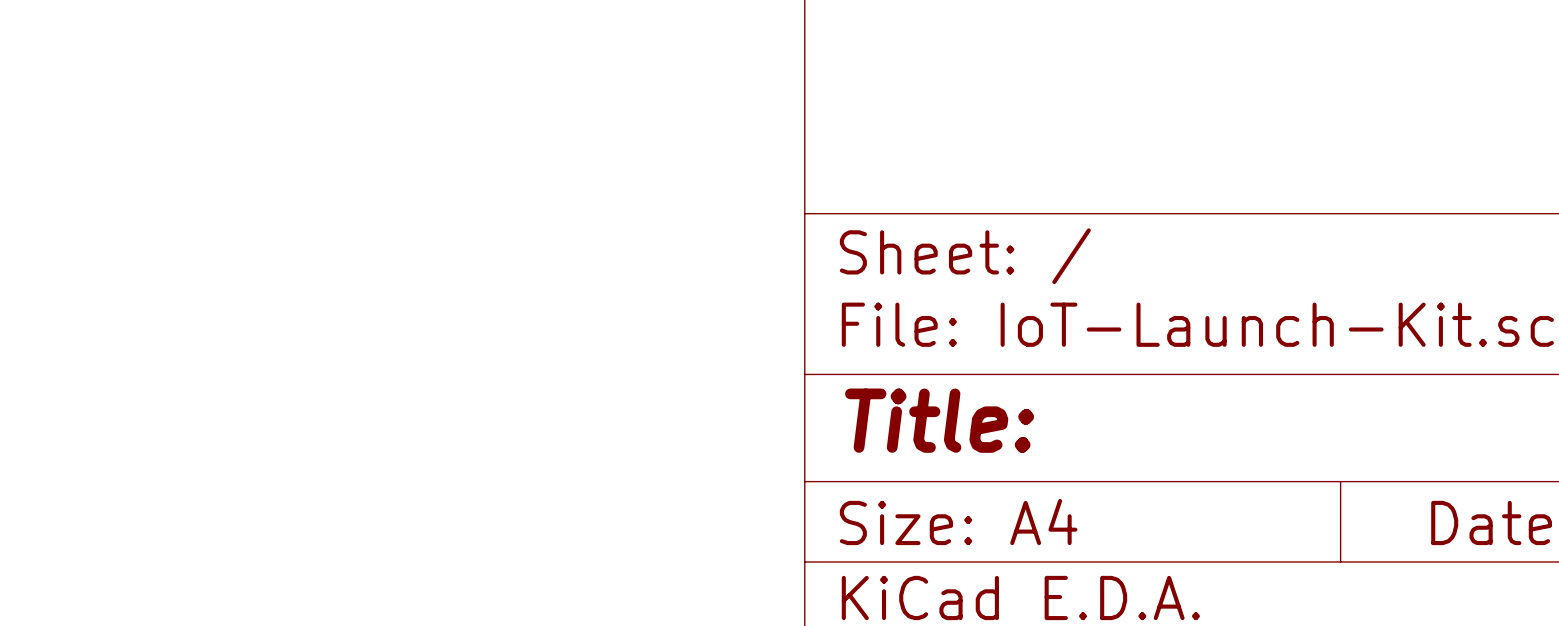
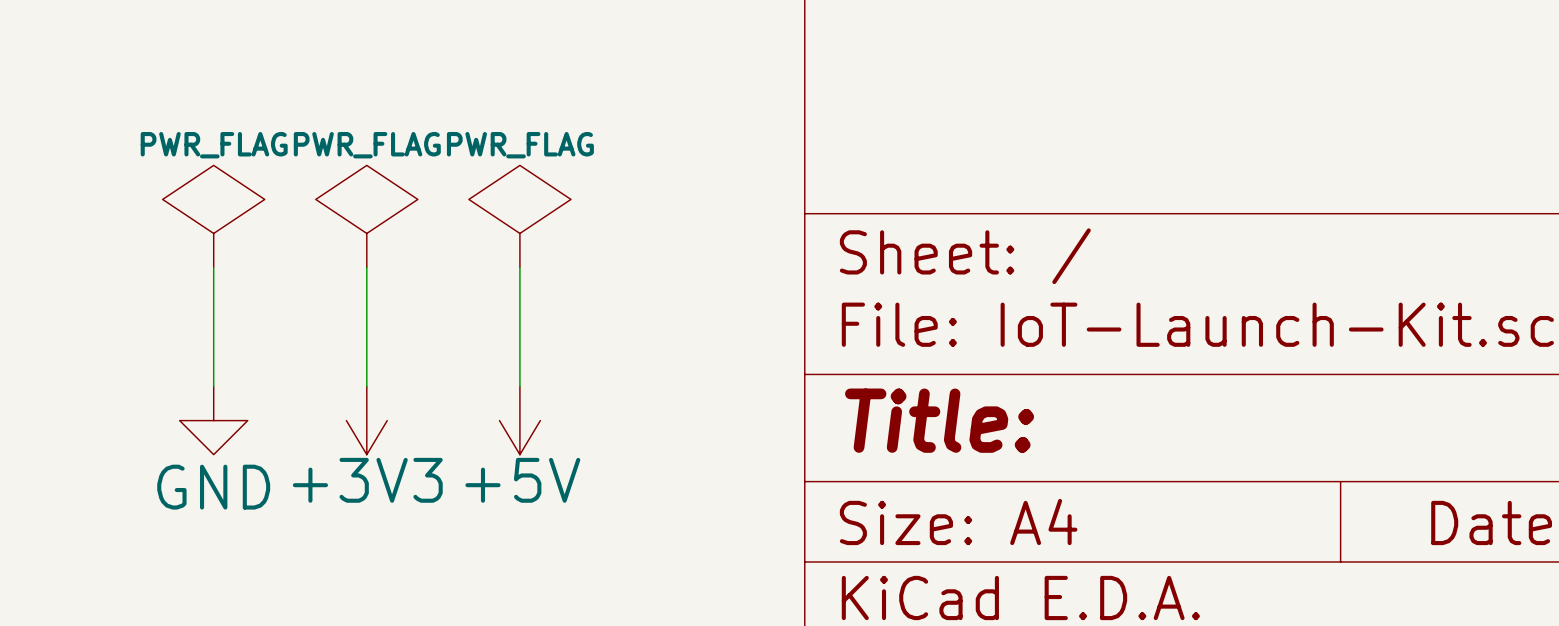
power symbol: none -> PWR_FLAG (213, 216)
power symbol: none -> PWR_FLAG (366, 216)
power symbol: none -> PWR_FLAG (519, 216)
wire: none -> (213, 267) (213, 386)
wire: none -> (366, 267) (366, 386)
wire: none -> (519, 267) (519, 386)
power symbol: none -> GND (213, 420)
power symbol: none -> +3V3 (366, 420)
power symbol: none -> +5V (519, 420)

